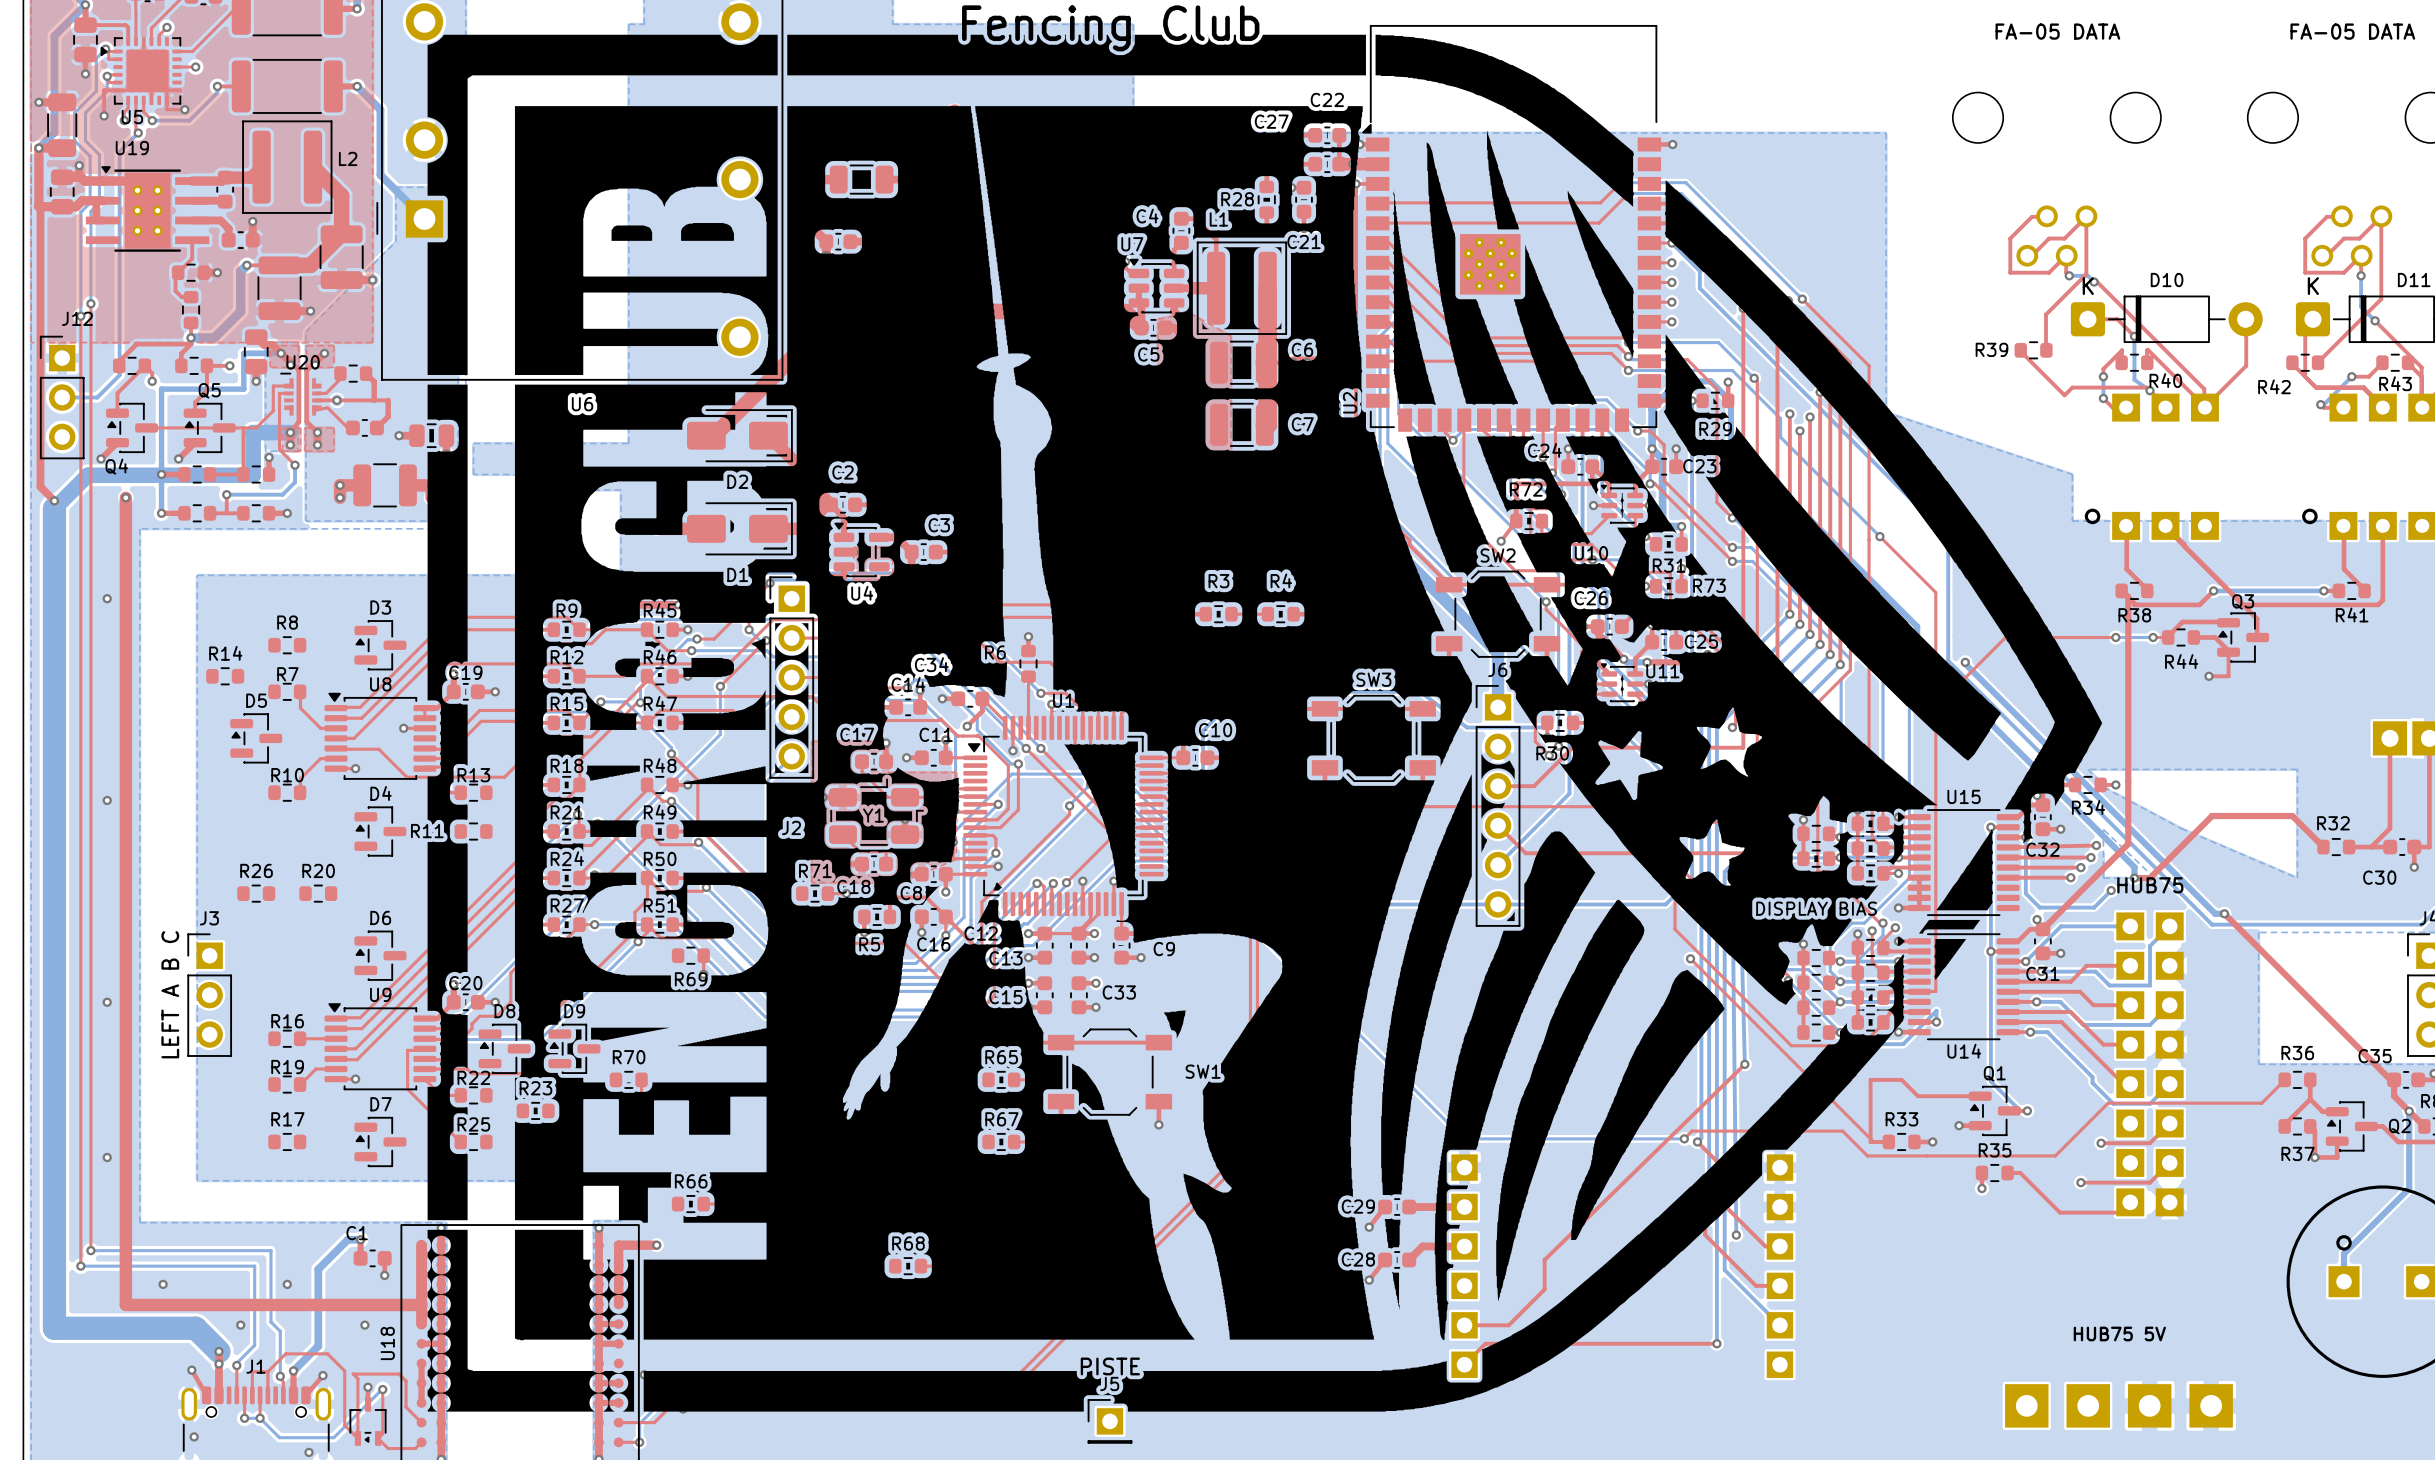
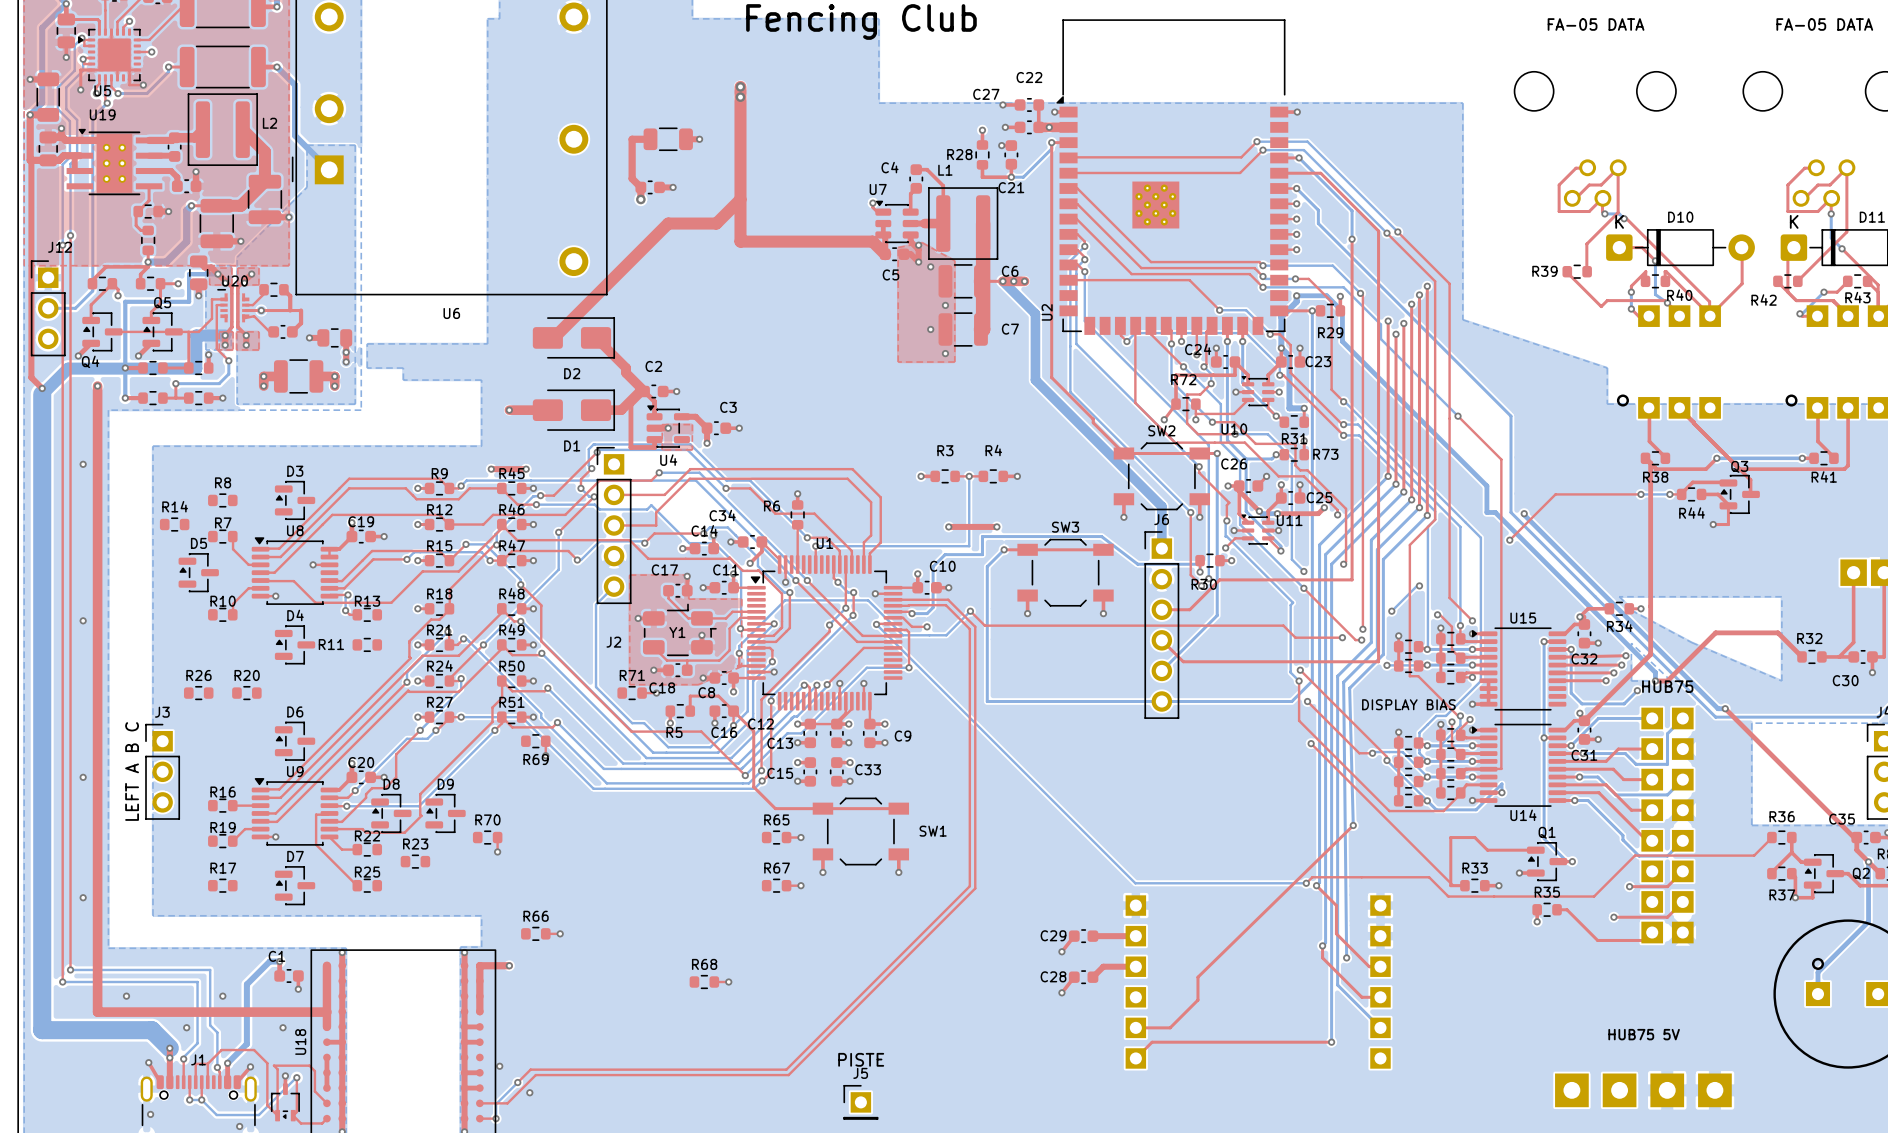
drawing: [427, 34, 2103, 1412] -> none

